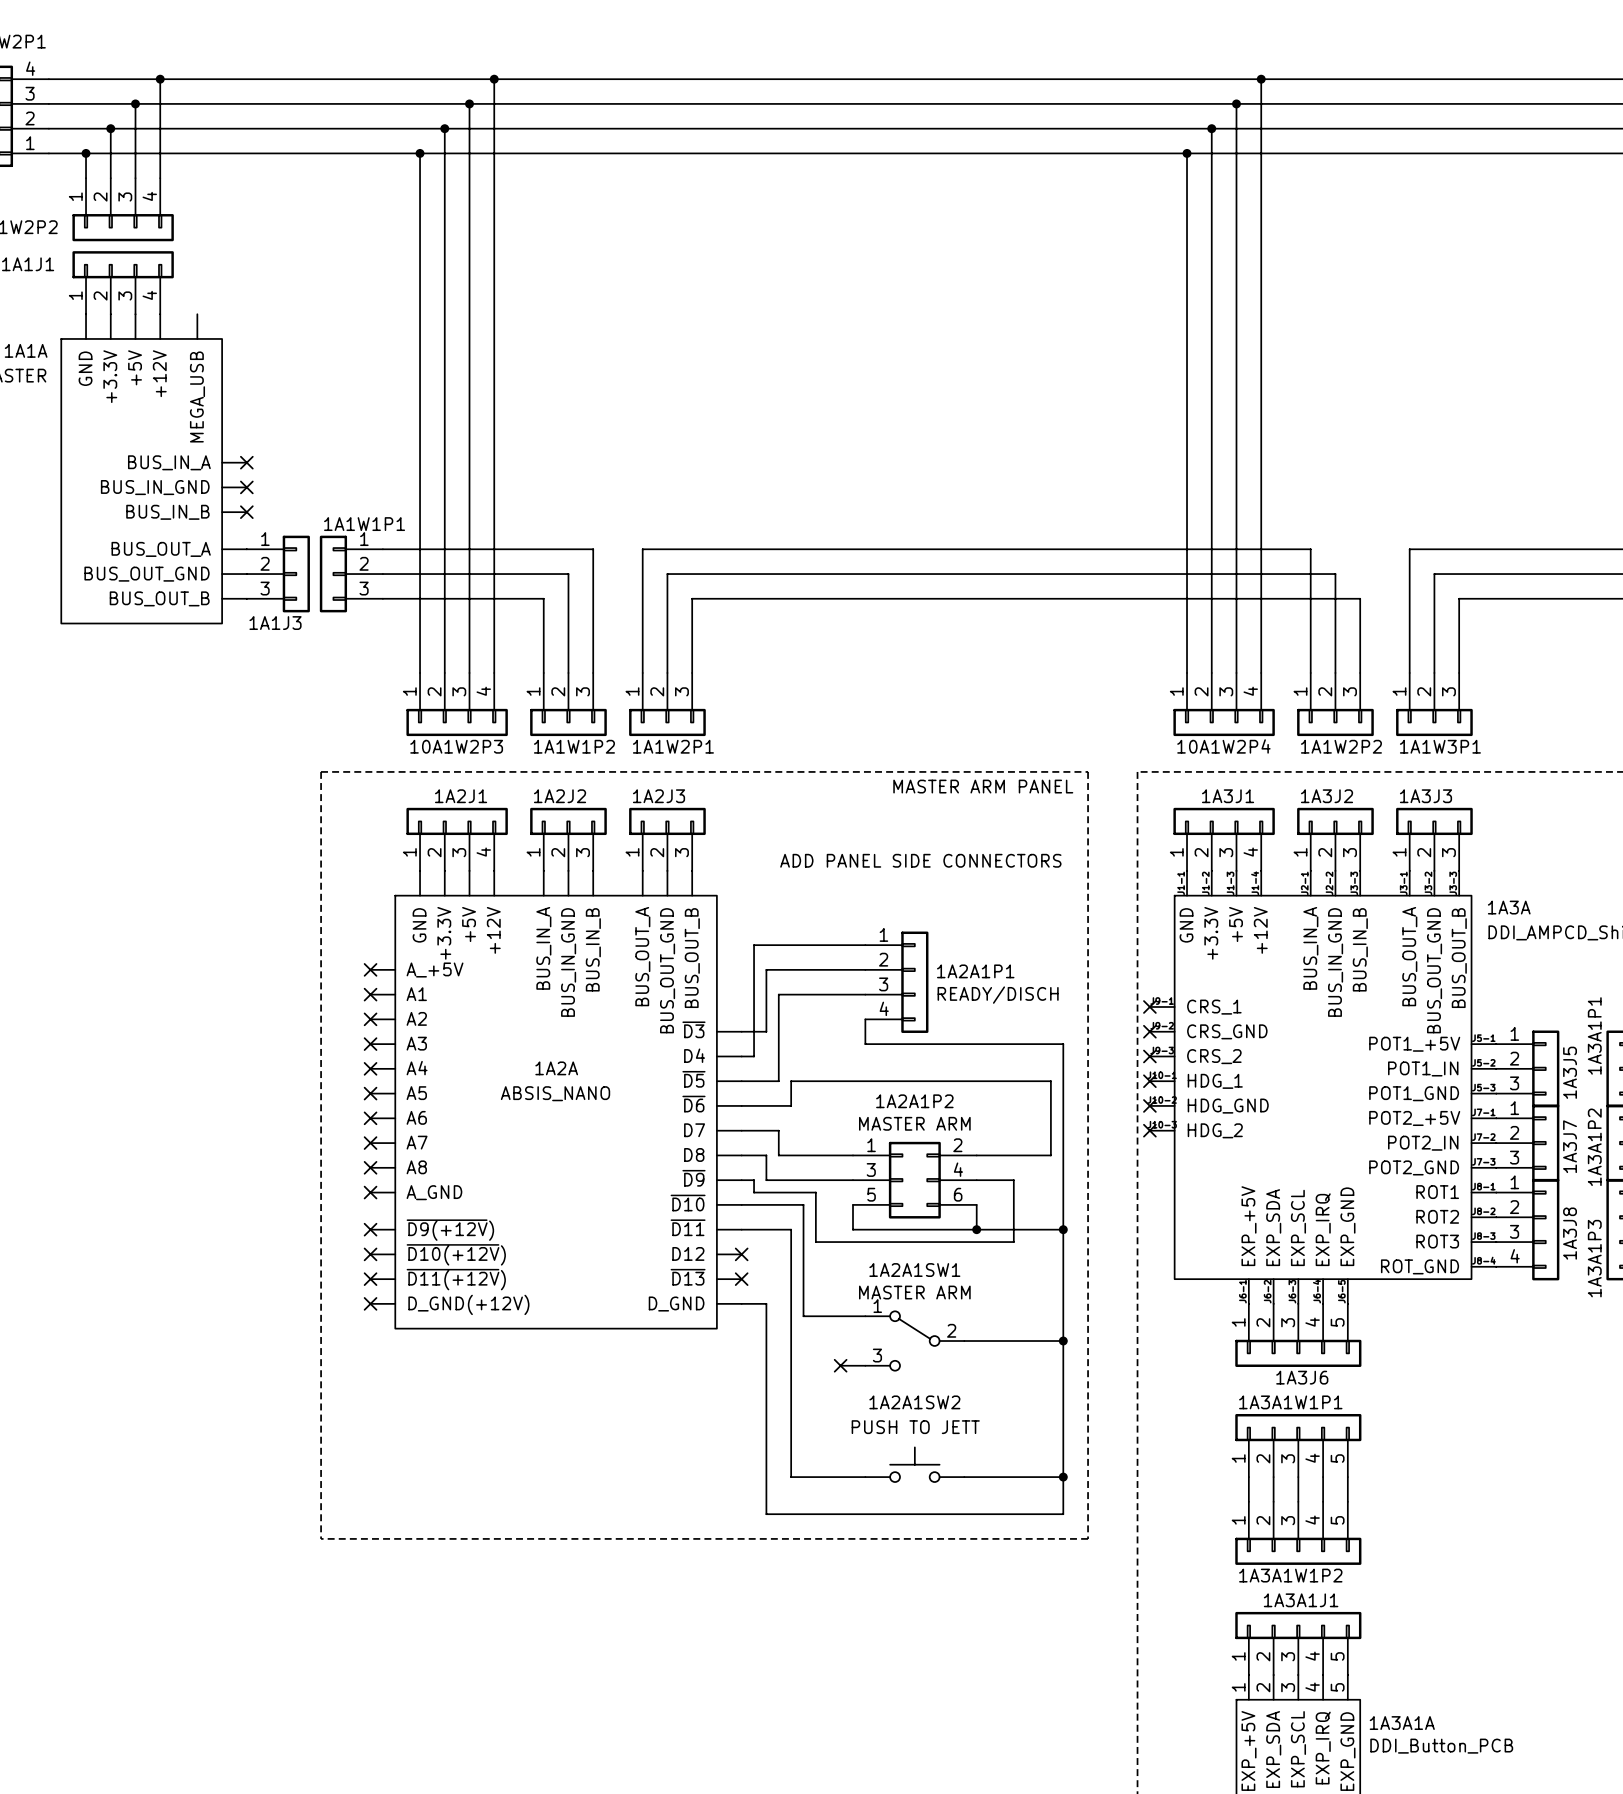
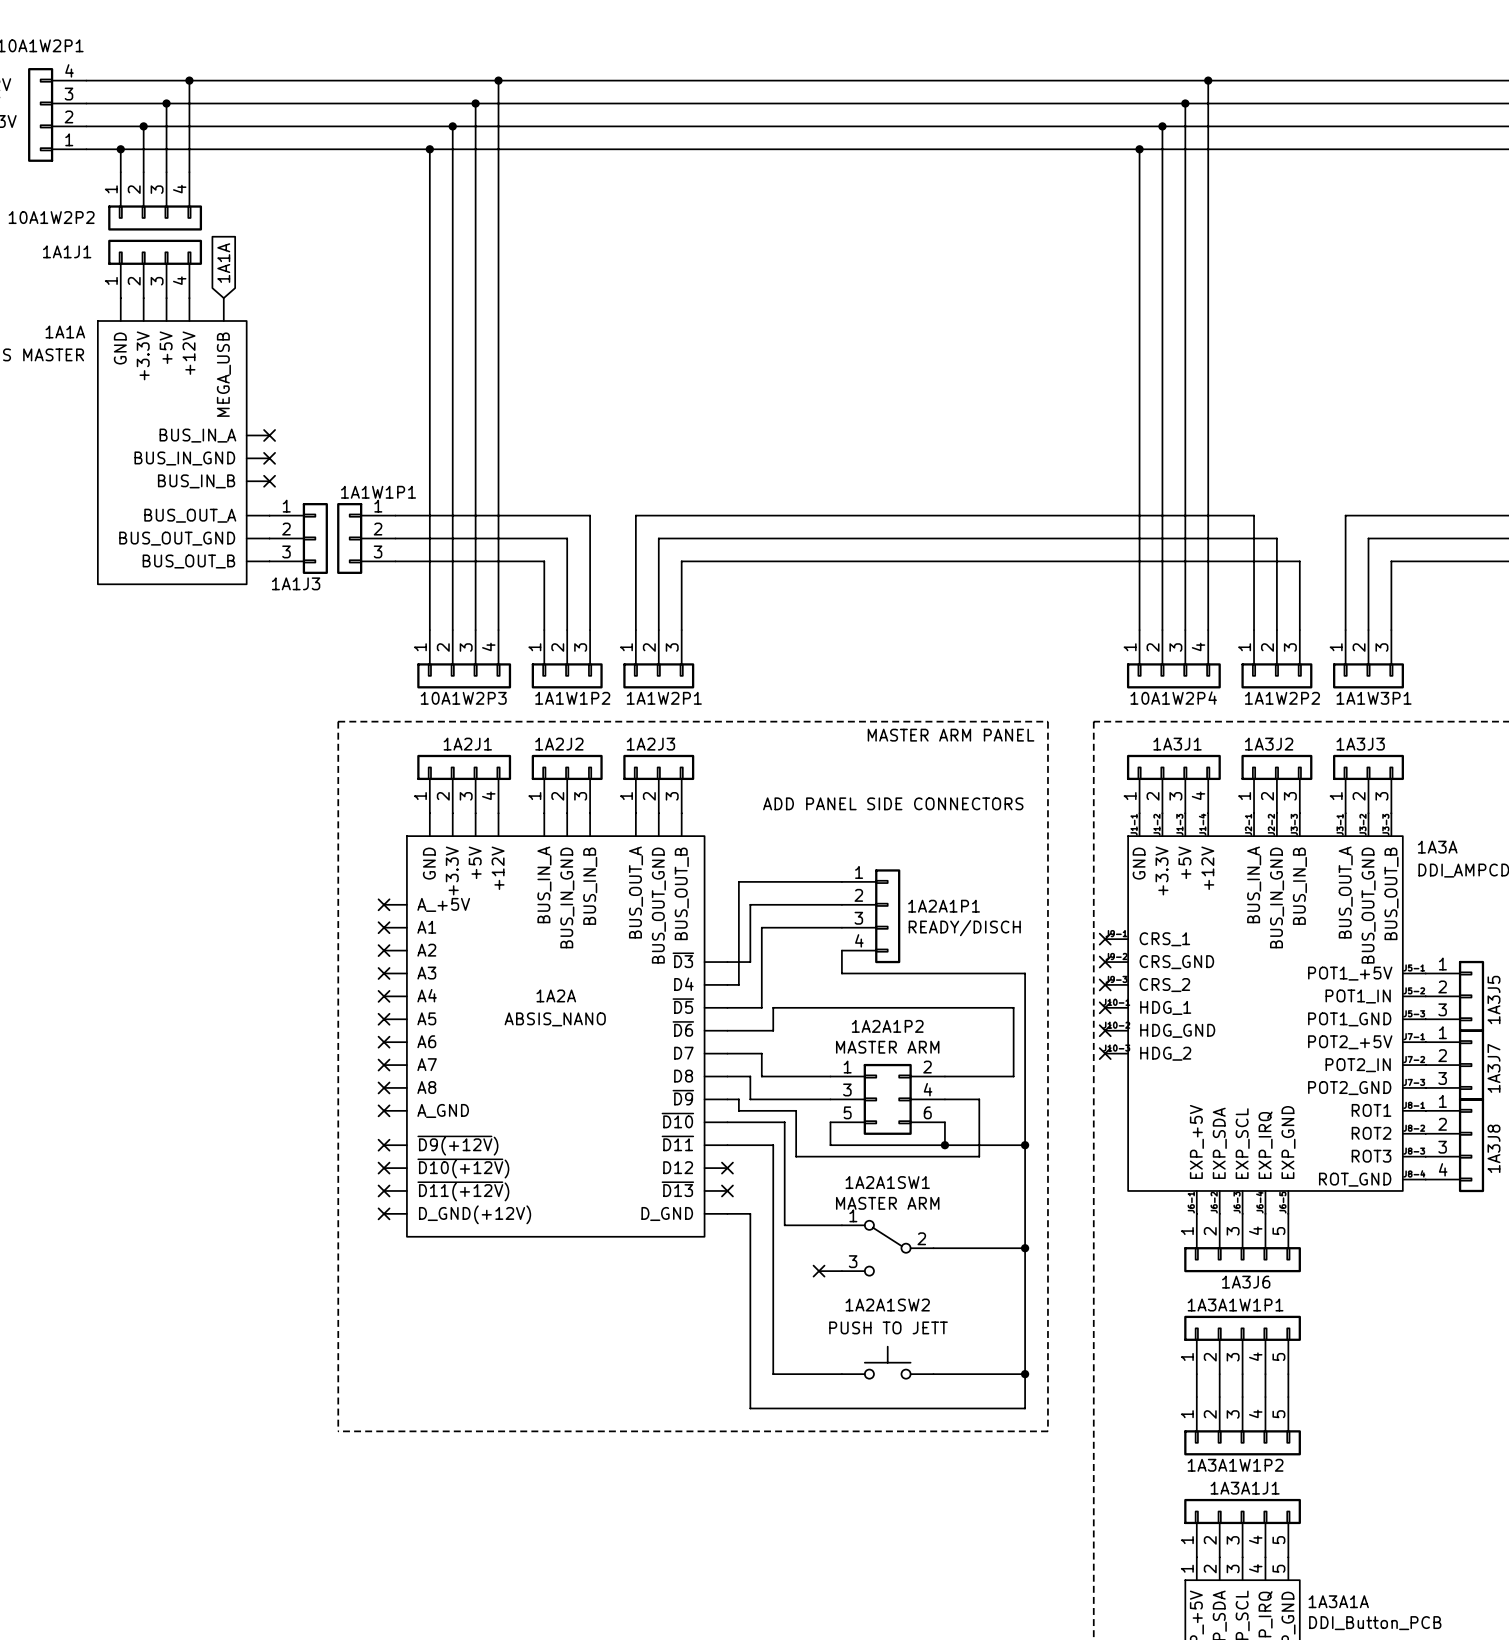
global label: none -> 1A1A (223, 263)

